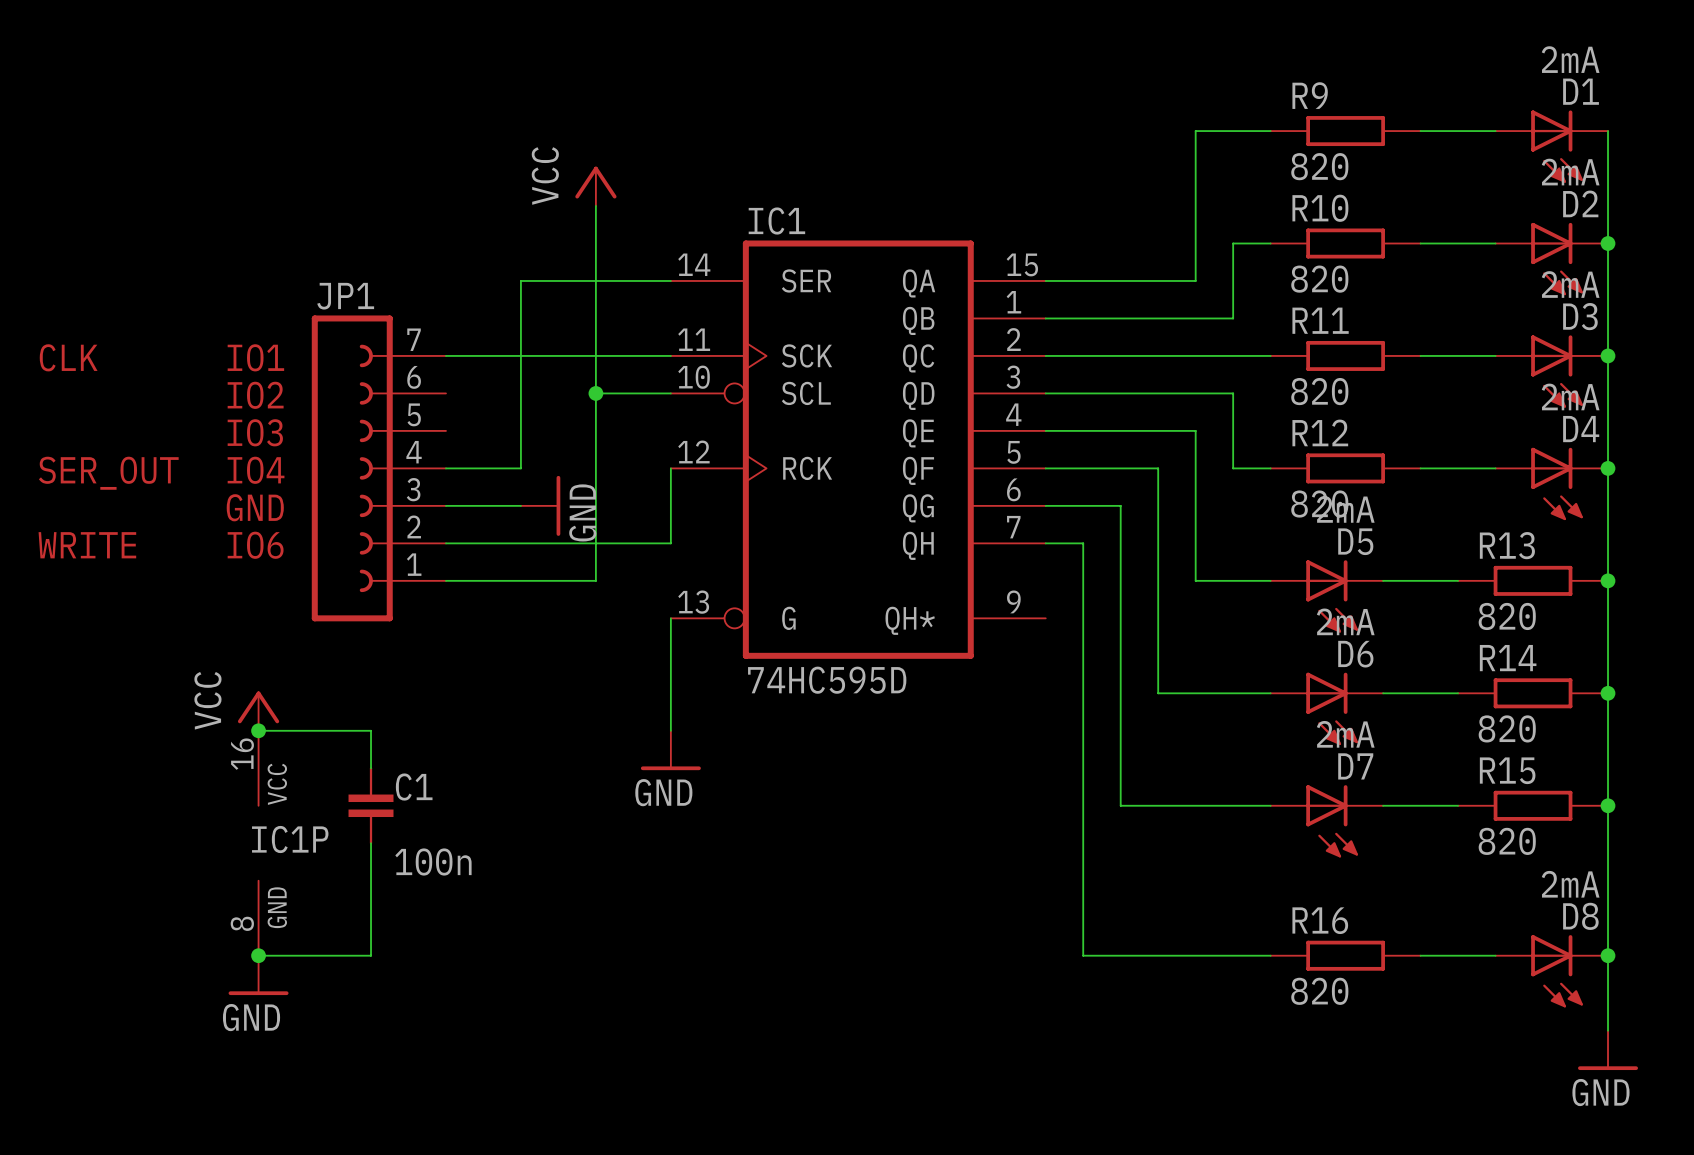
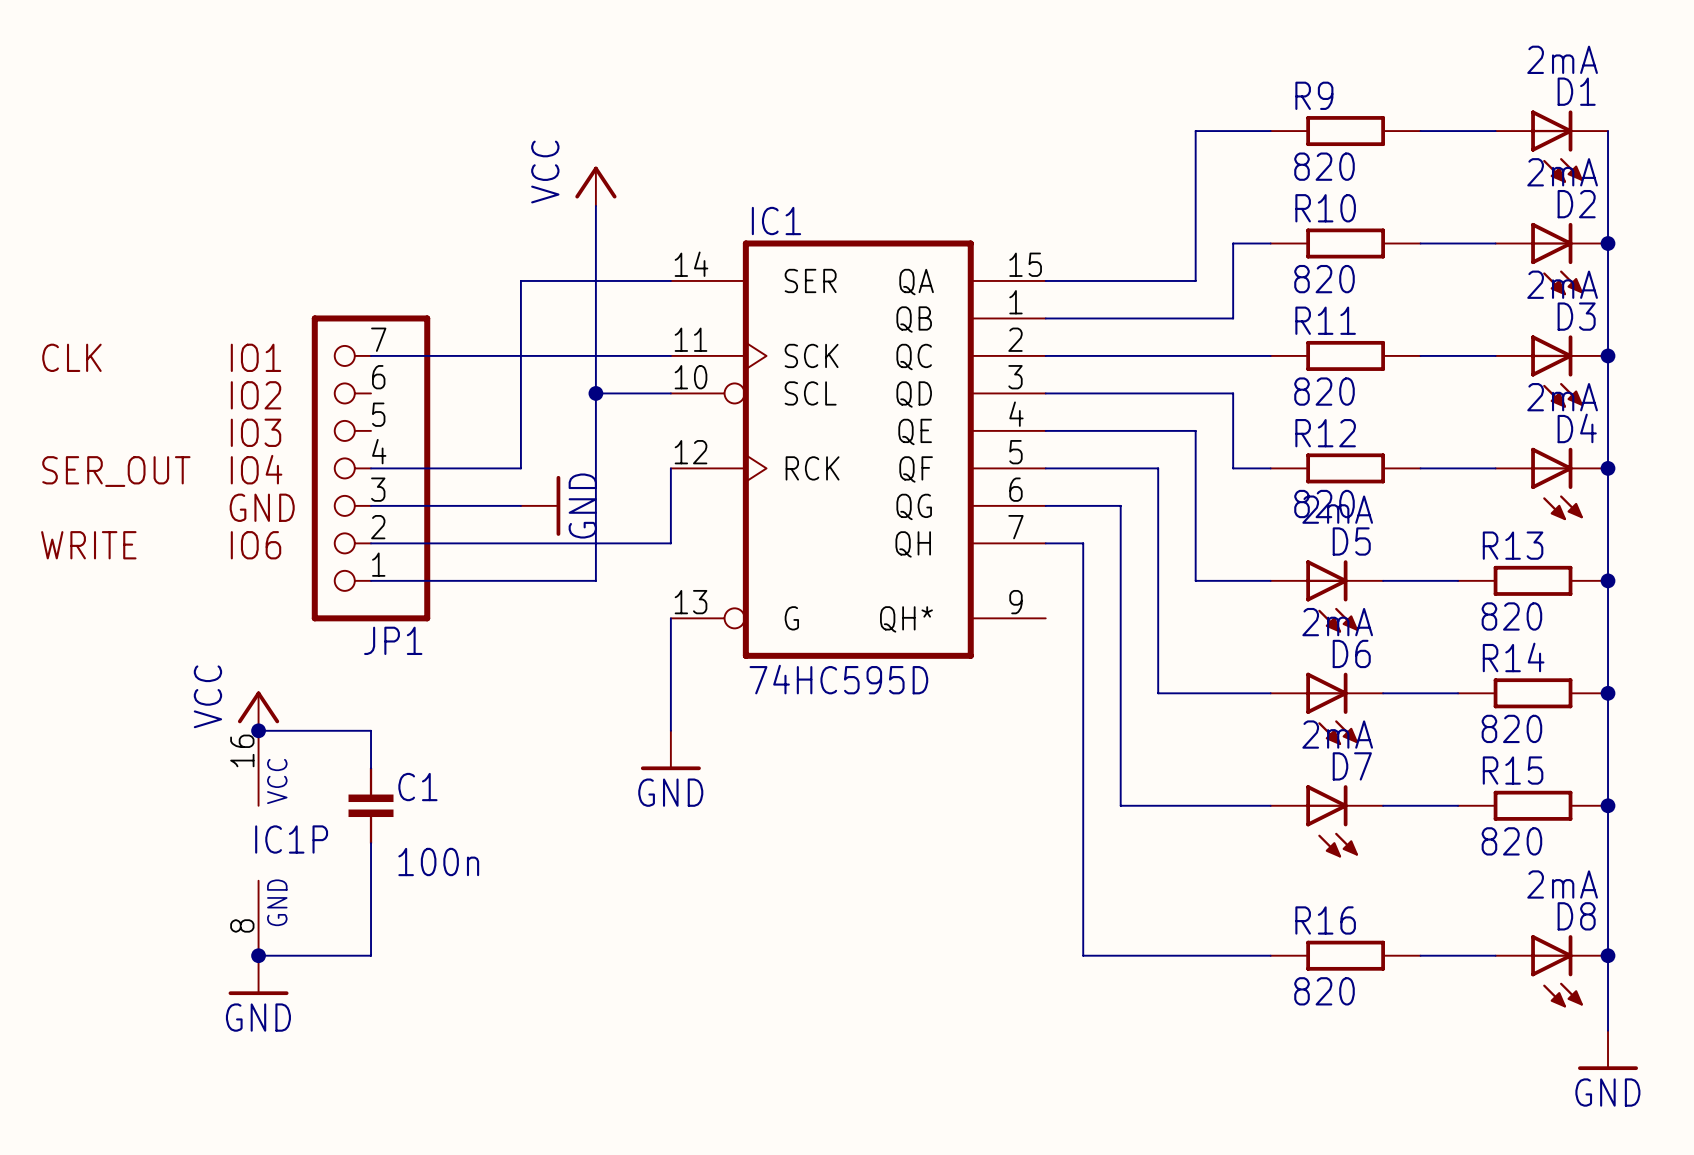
JP1 name position: JP1 (345, 296) -> JP1 (393, 640)
JP1 symbol: [311, 315, 446, 622] -> [311, 315, 431, 622]

